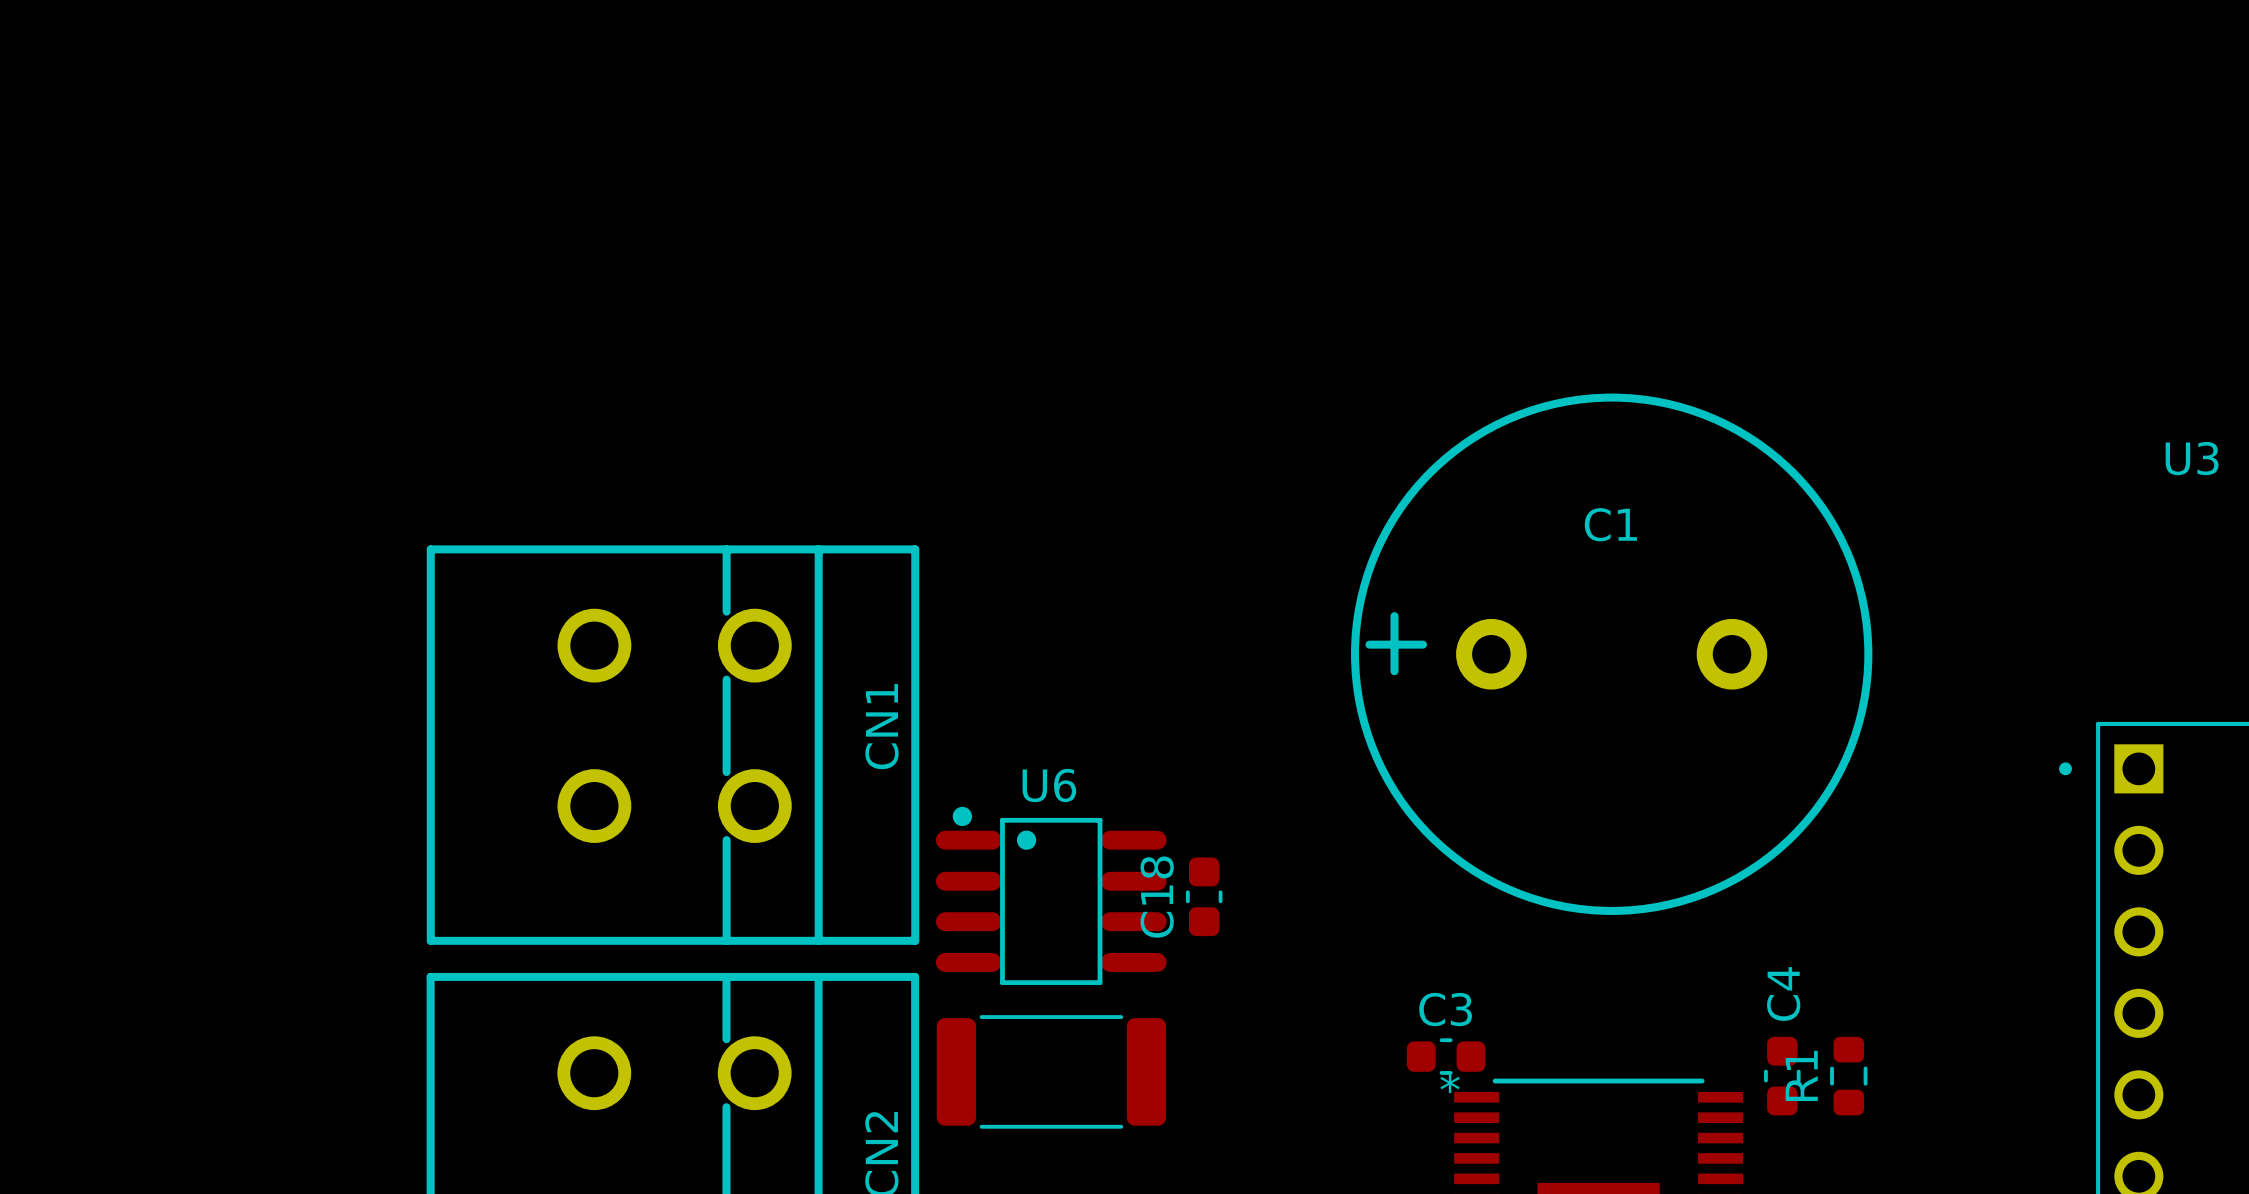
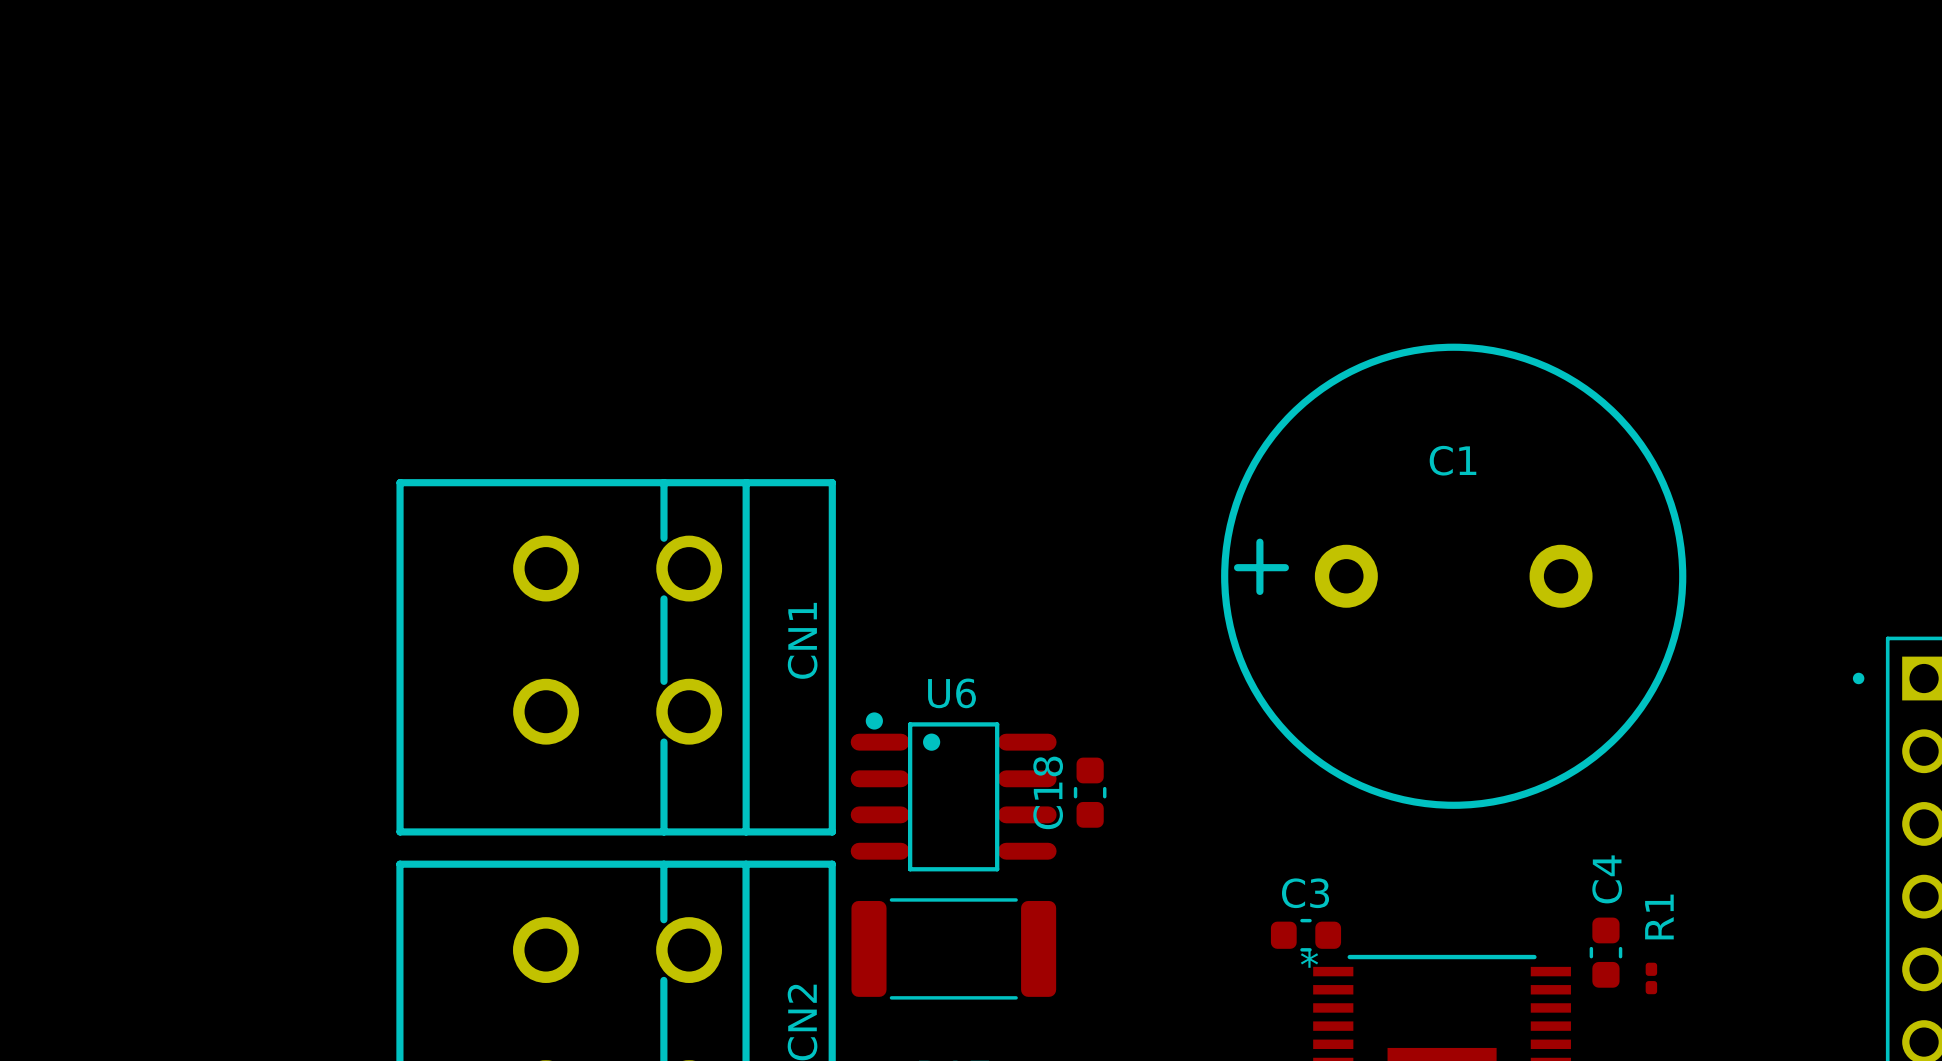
R1 footprint: [1830, 1036, 1868, 1116] -> [1645, 962, 1658, 995]
R1 name position: R1 (1801, 1075) -> R1 (1659, 916)

